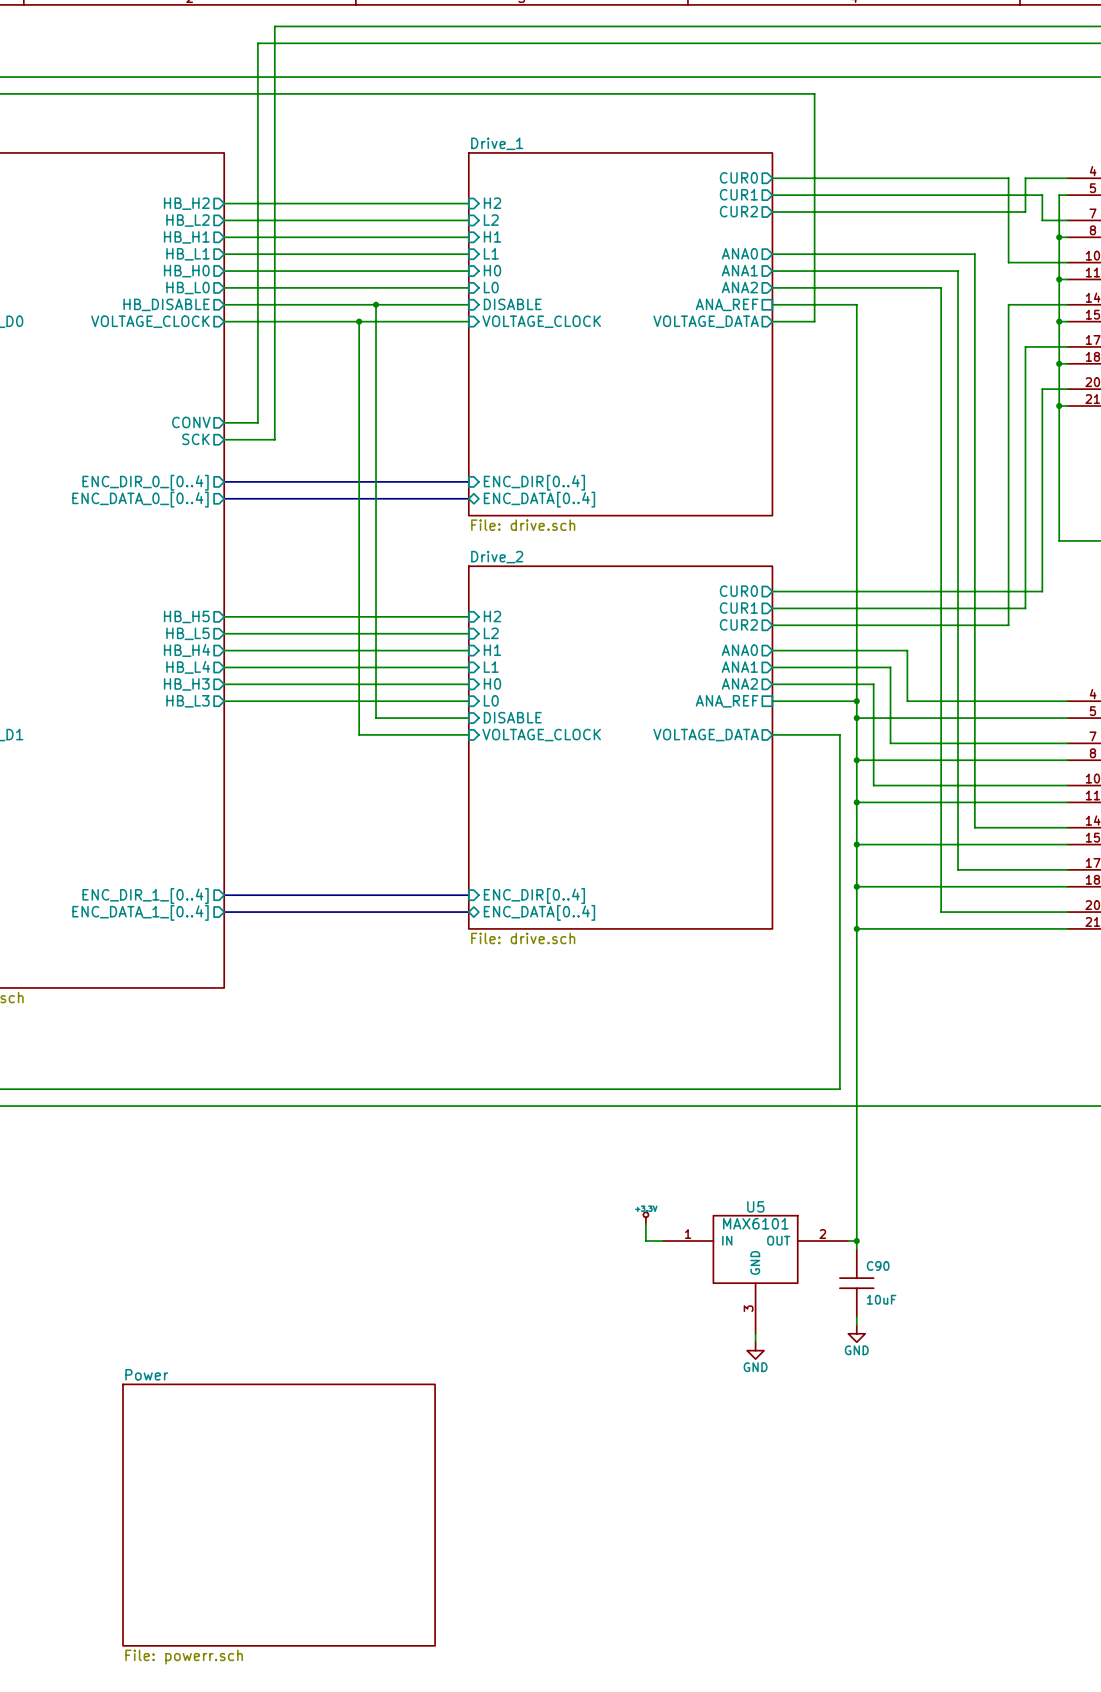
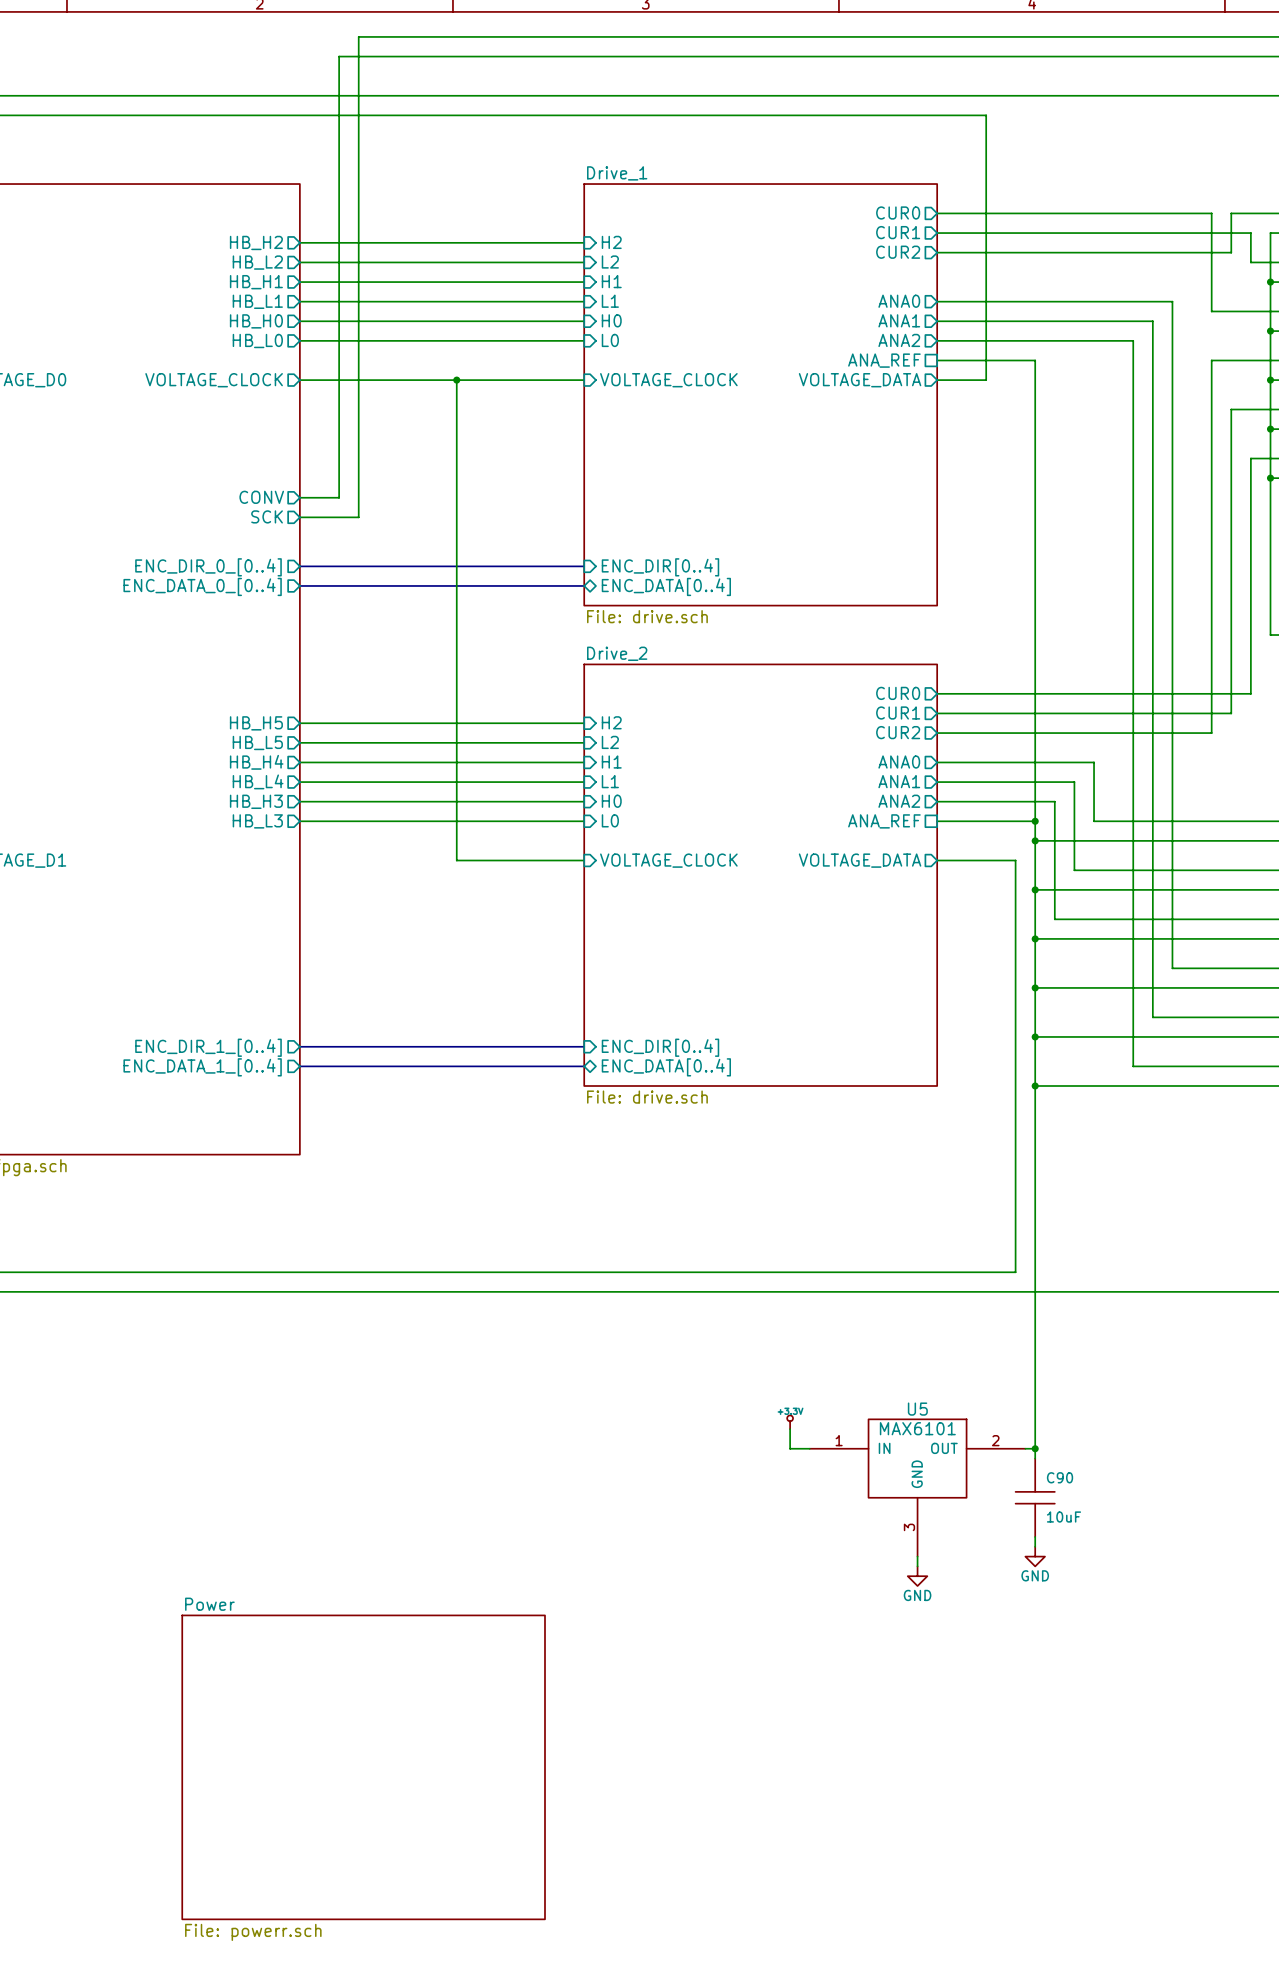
sheet pin: HB_DISABLE (166, 304) -> none
wire: (224, 304) (468, 304) -> none
wire: (376, 304) (376, 718) (468, 718) -> none
junction: (376, 304) -> none
sheet pin: DISABLE (512, 304) -> none
sheet pin: DISABLE (512, 717) -> none

